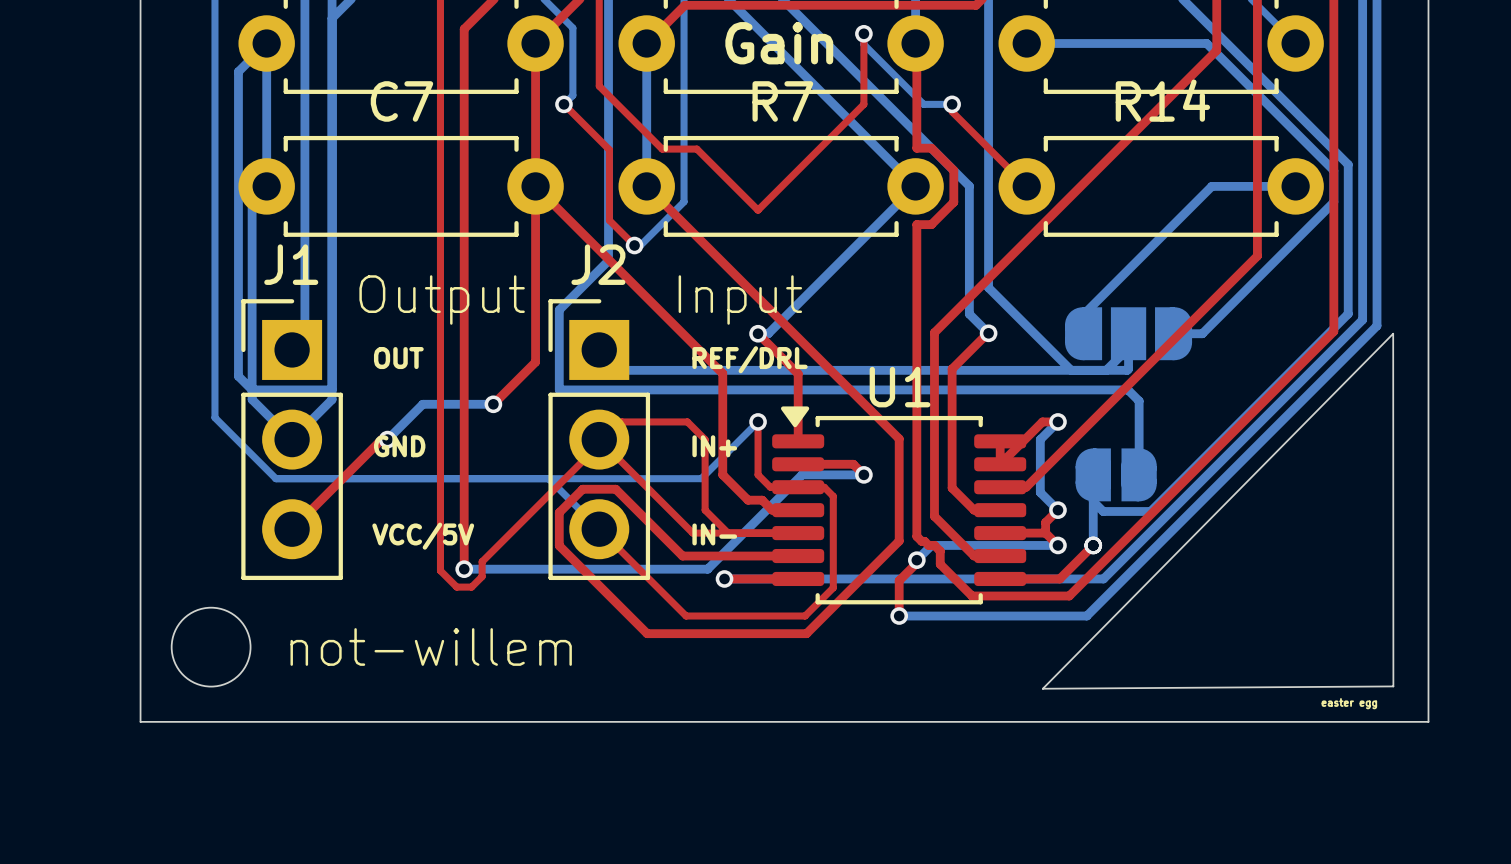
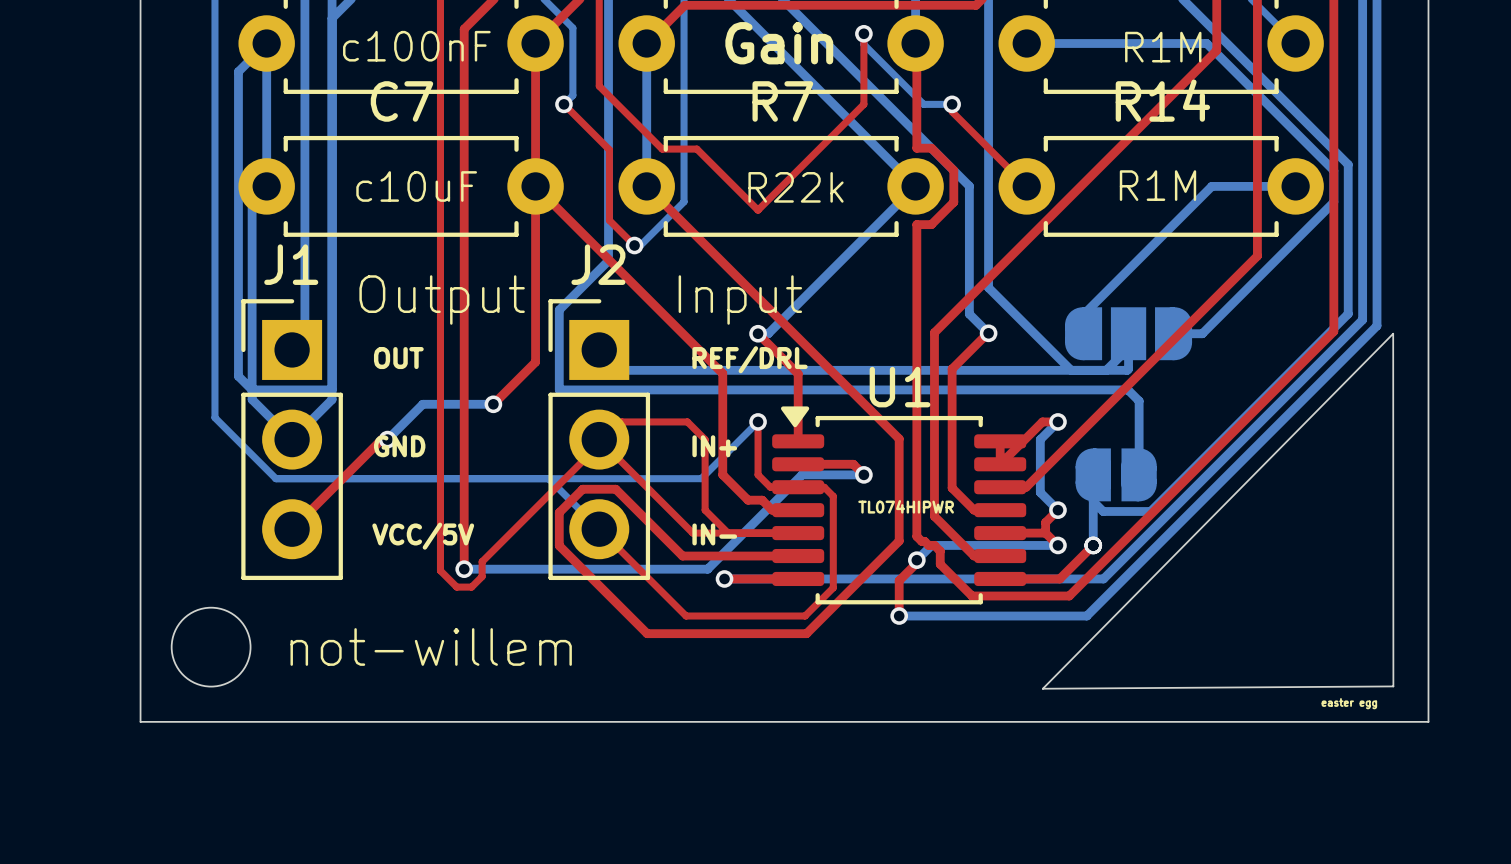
text: none -> c100nF (416, 46)
text: none -> R1M (1163, 47)
text: none -> R1M (1157, 185)
text: none -> c10uF (416, 186)
text: none -> R22k (796, 187)
text: none -> TL074HIPWR (906, 506)

